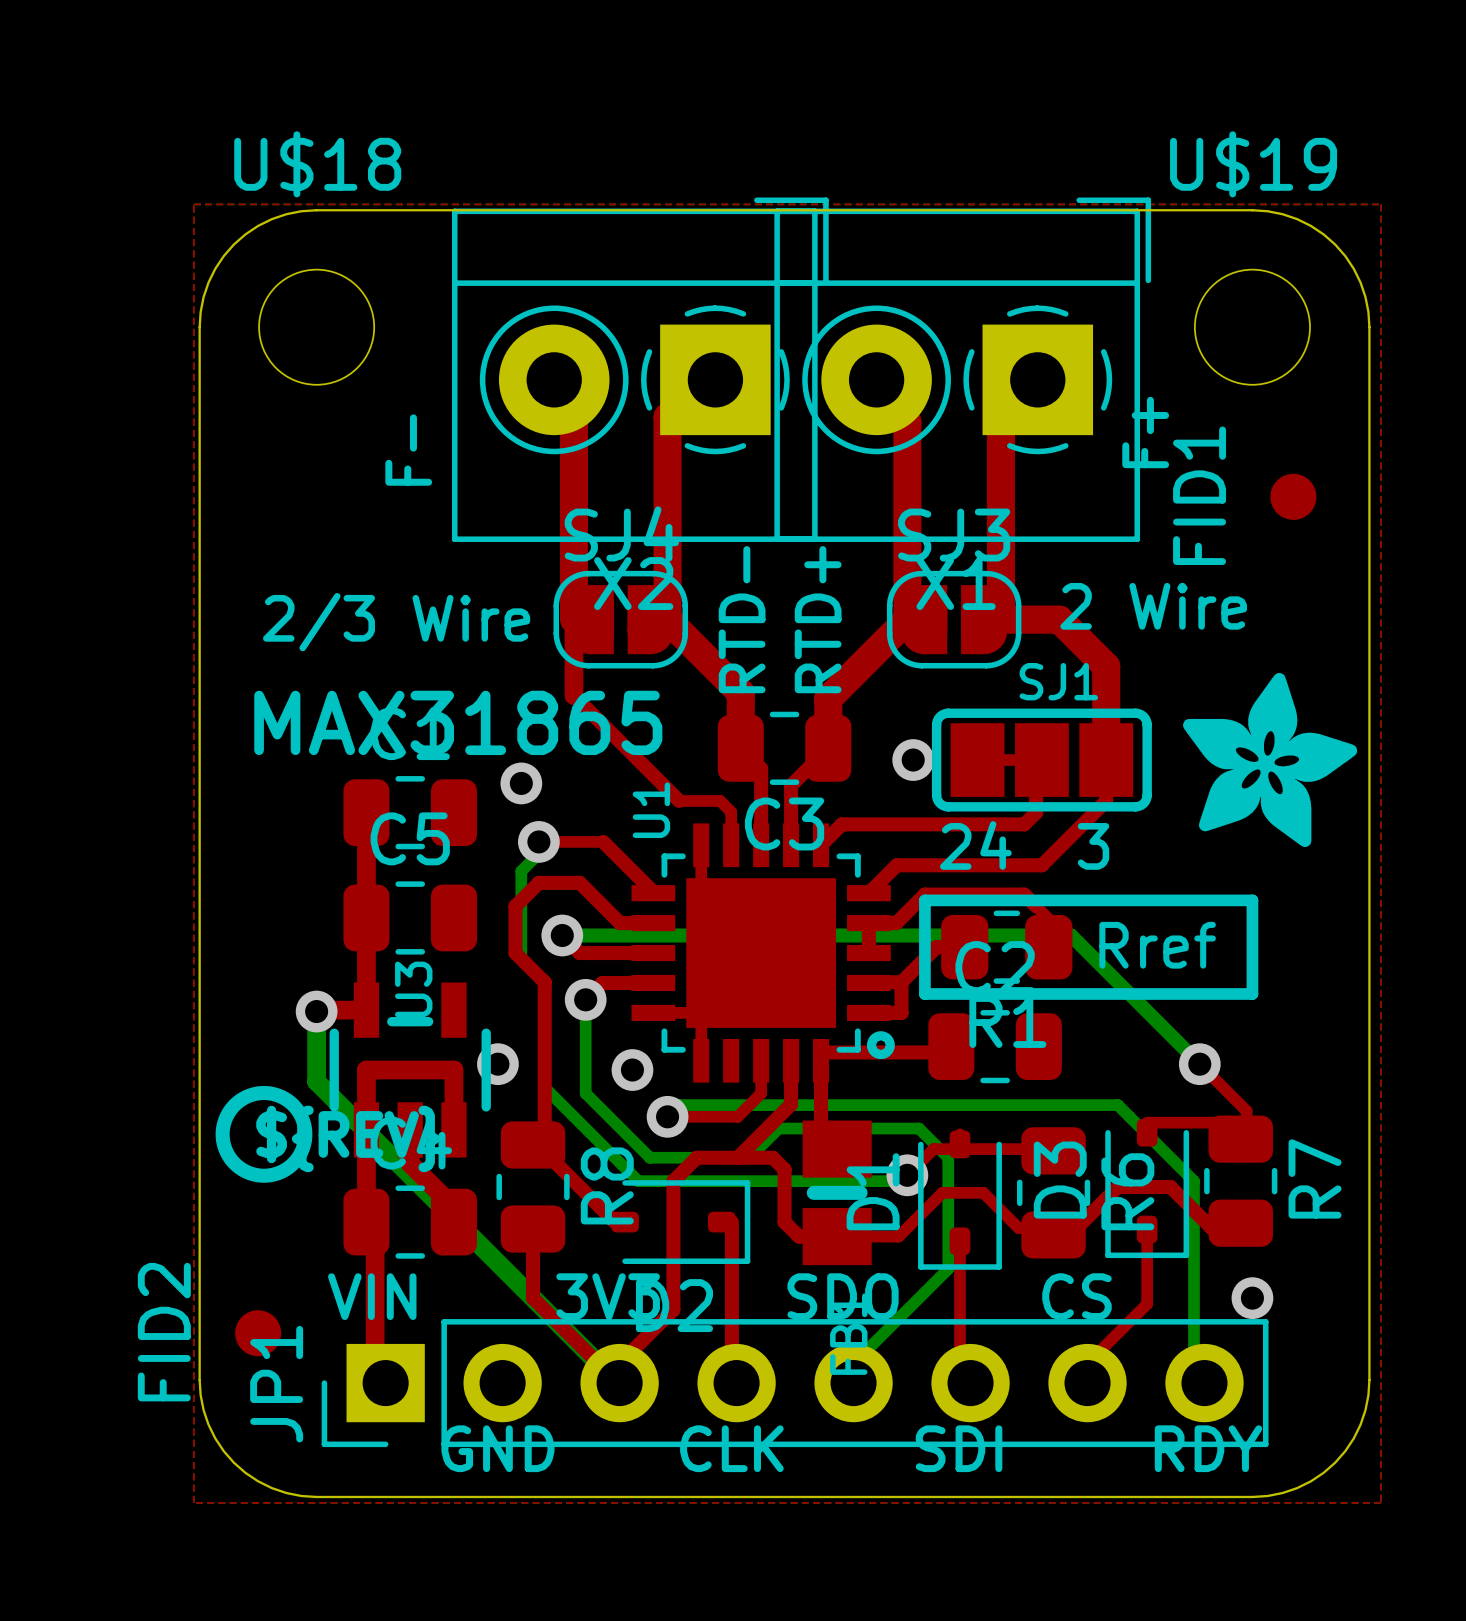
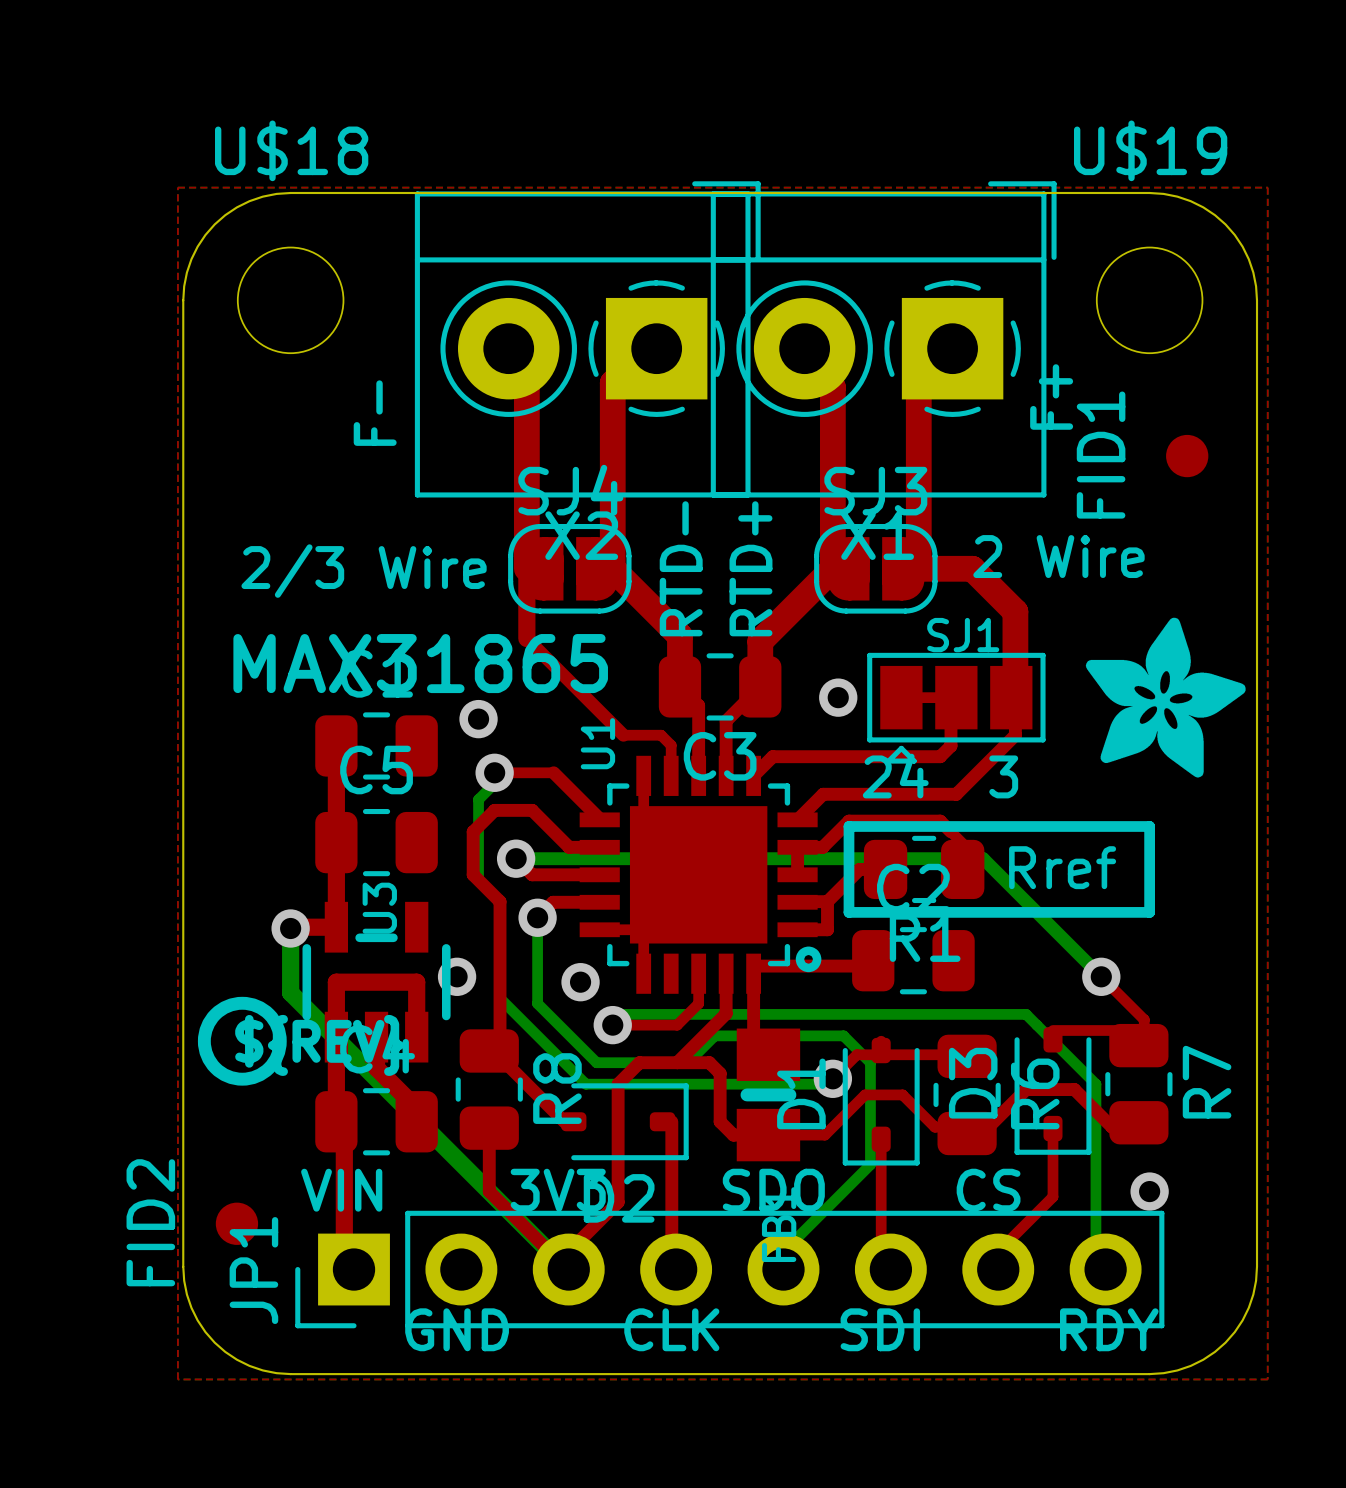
SJ1 name position: SJ1 (1058, 681) -> SJ1 (963, 635)
SJ1 footprint: [931, 708, 1152, 812] -> [867, 652, 1046, 764]

